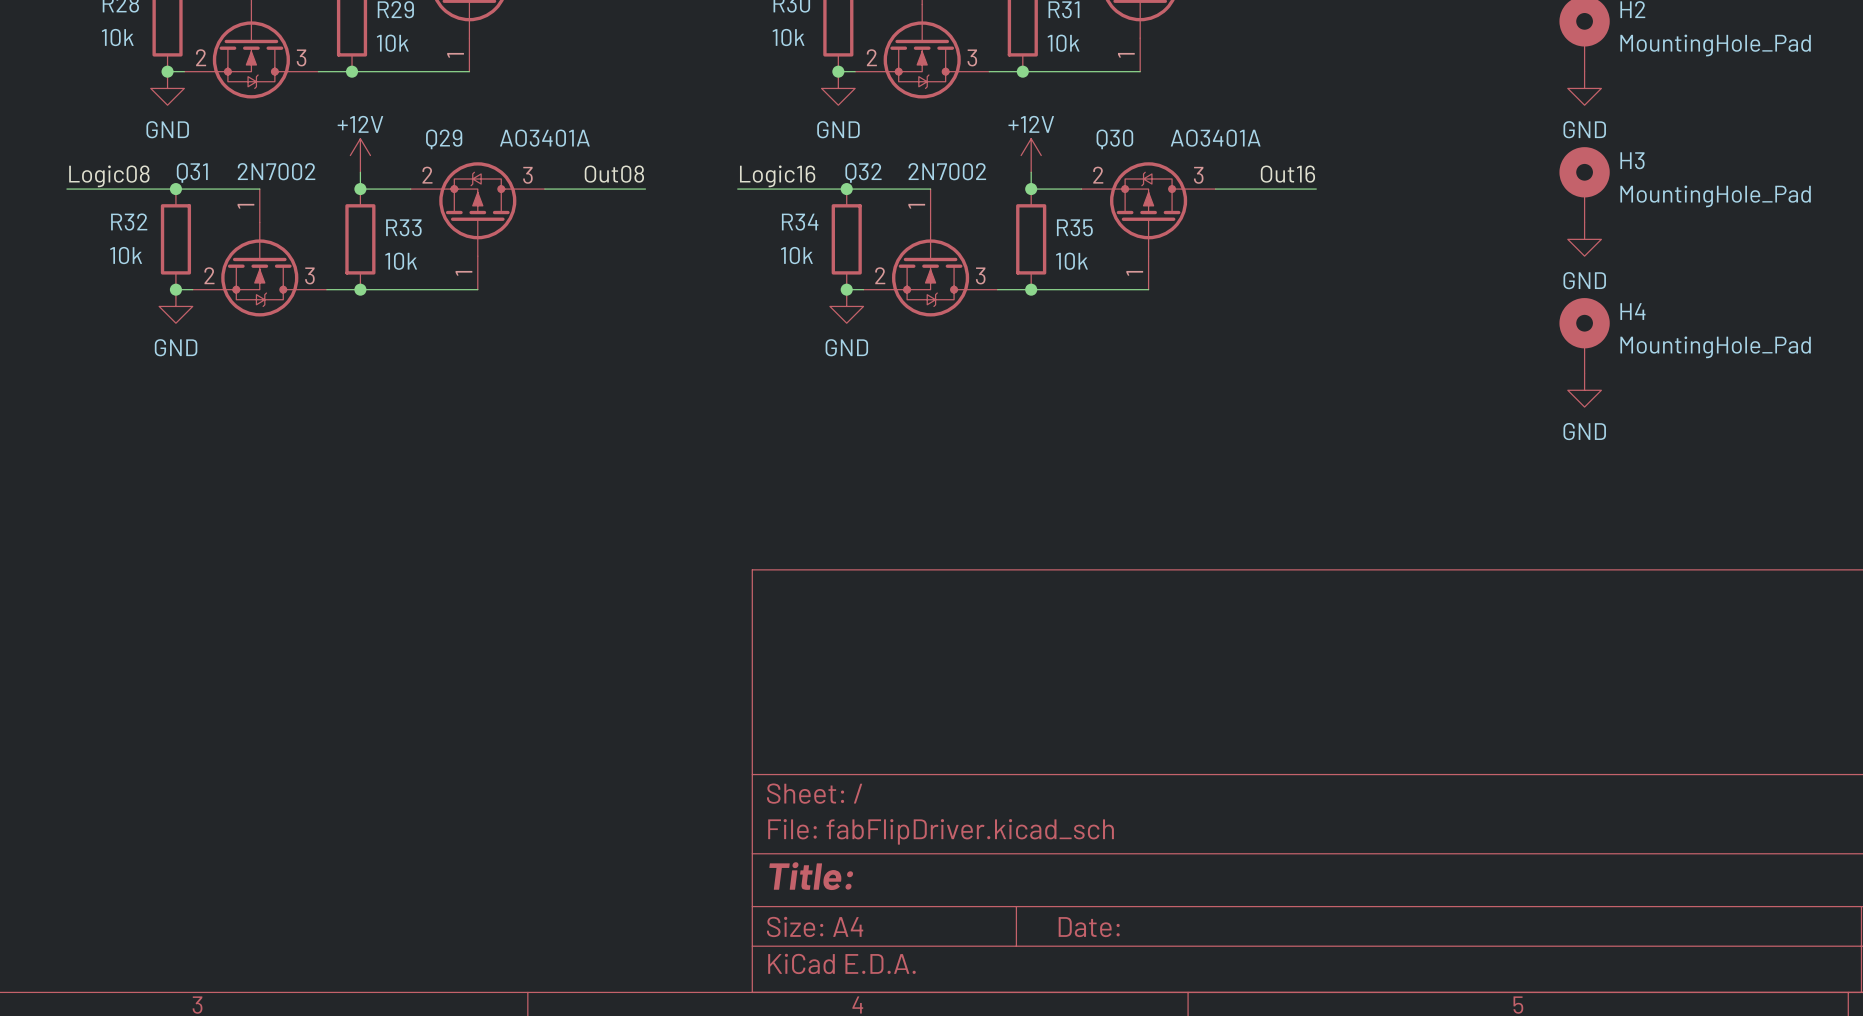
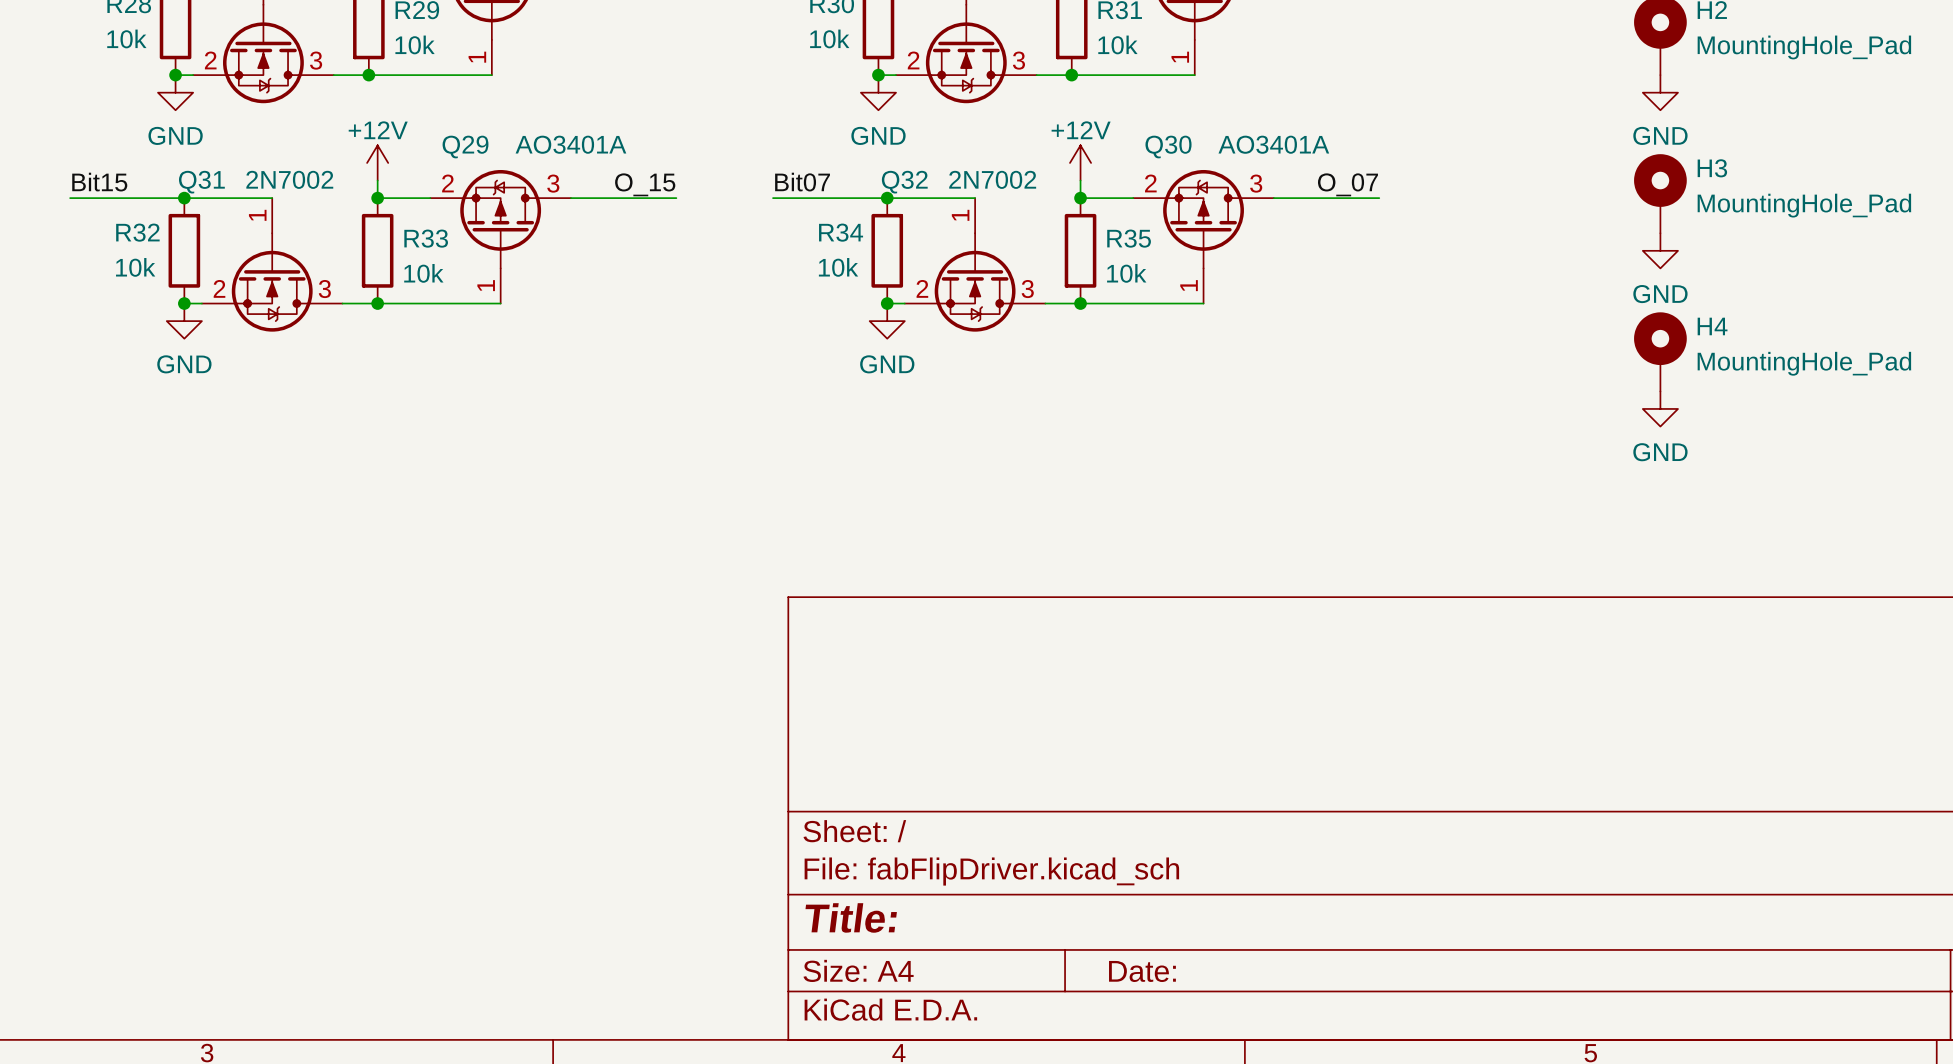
label: Out08 (614, 174) -> O_15 (645, 184)
label: Out16 (1287, 174) -> O_07 (1347, 184)
label: Logic08 (109, 176) -> Bit15 (99, 182)
label: Logic16 (777, 176) -> Bit07 (802, 182)

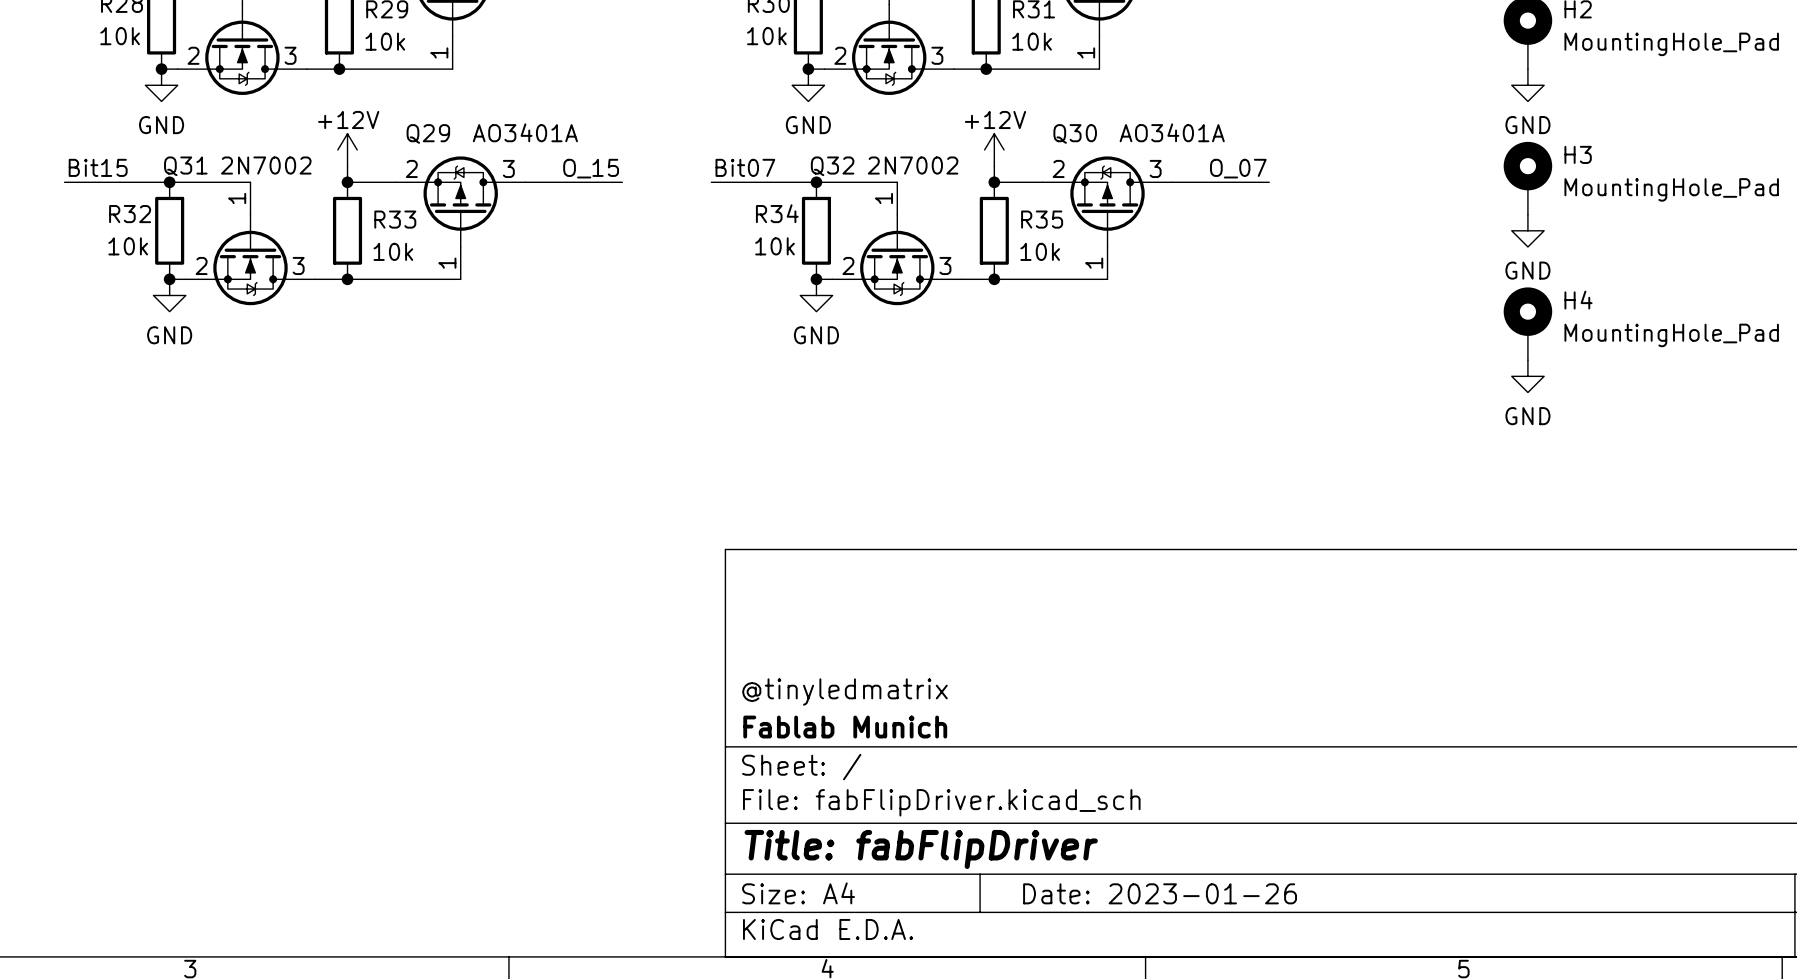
title block: none -> @tinyledmatrix (844, 692)
title block: none -> Fablab Munich (845, 727)
title block: Title: (851, 917) -> Title: fabFlipDriver (921, 849)
title block: Date: (1142, 971) -> Date: 2023-01-26 (1160, 893)

